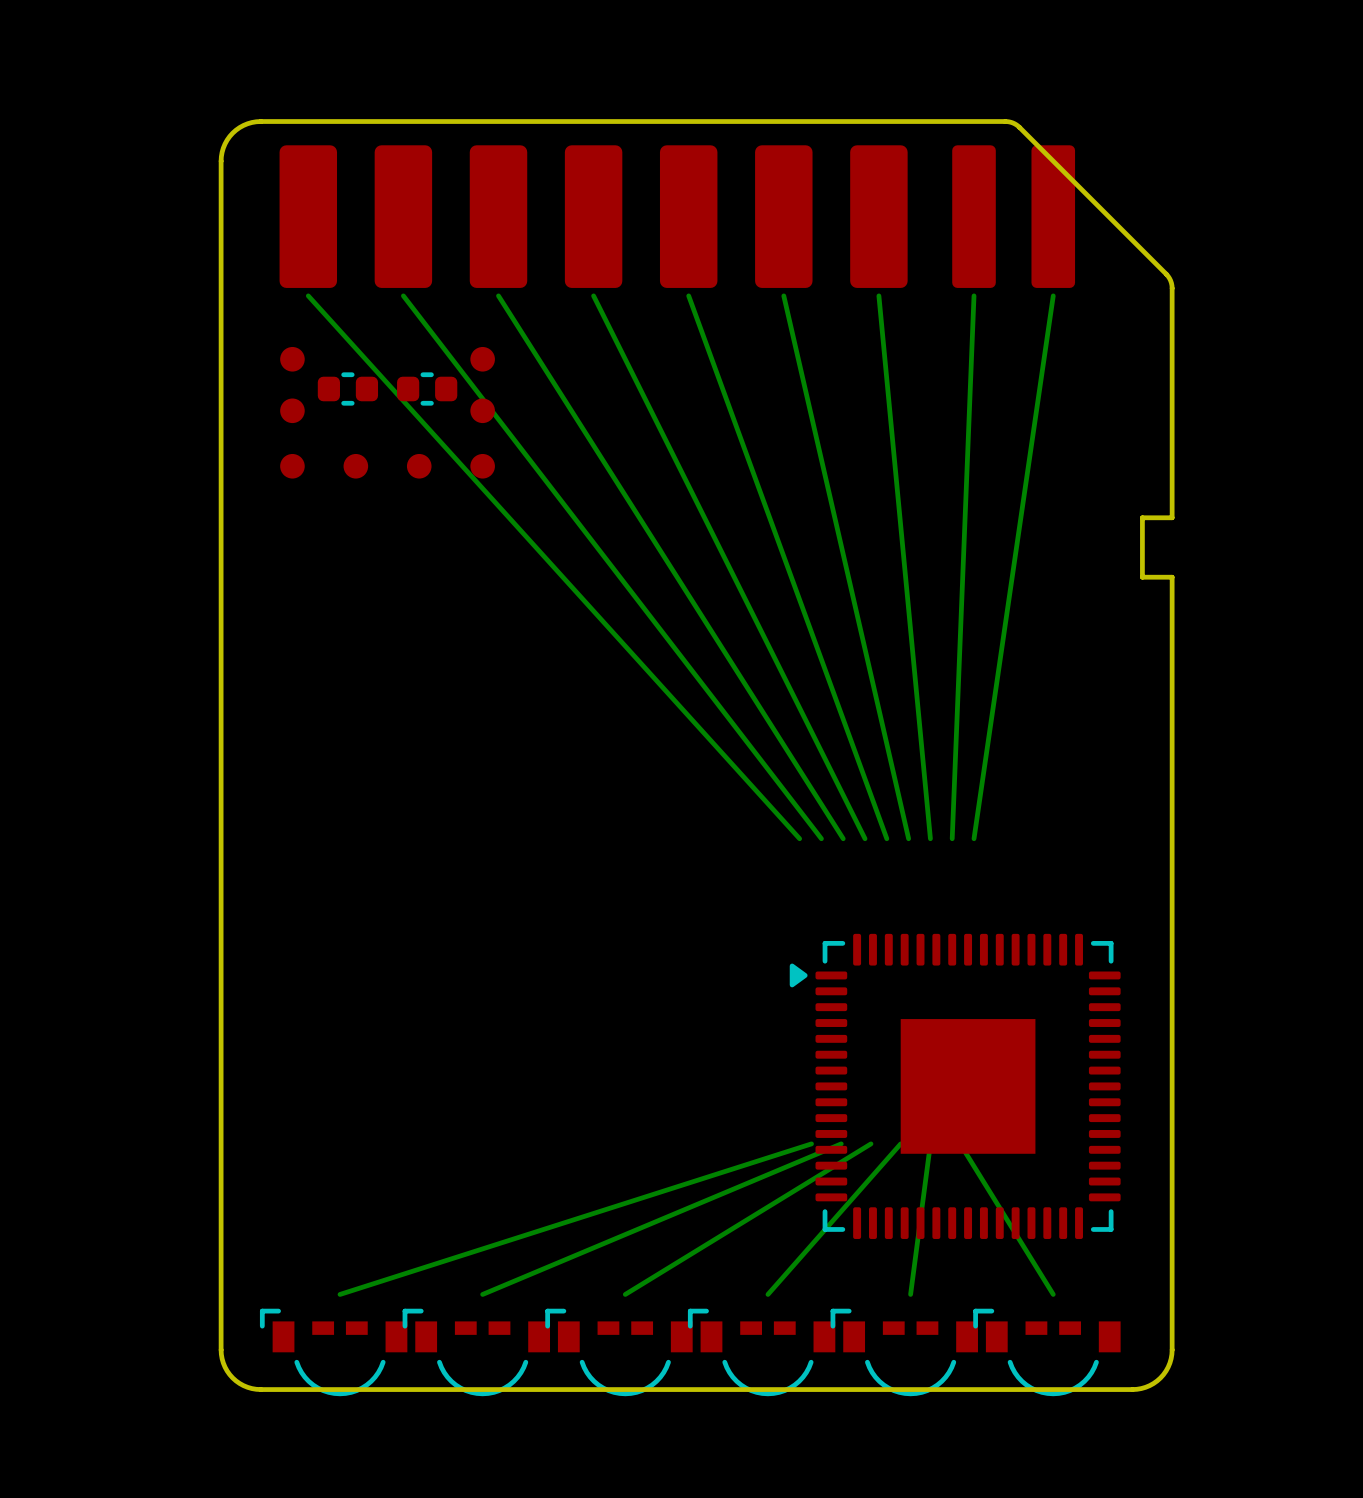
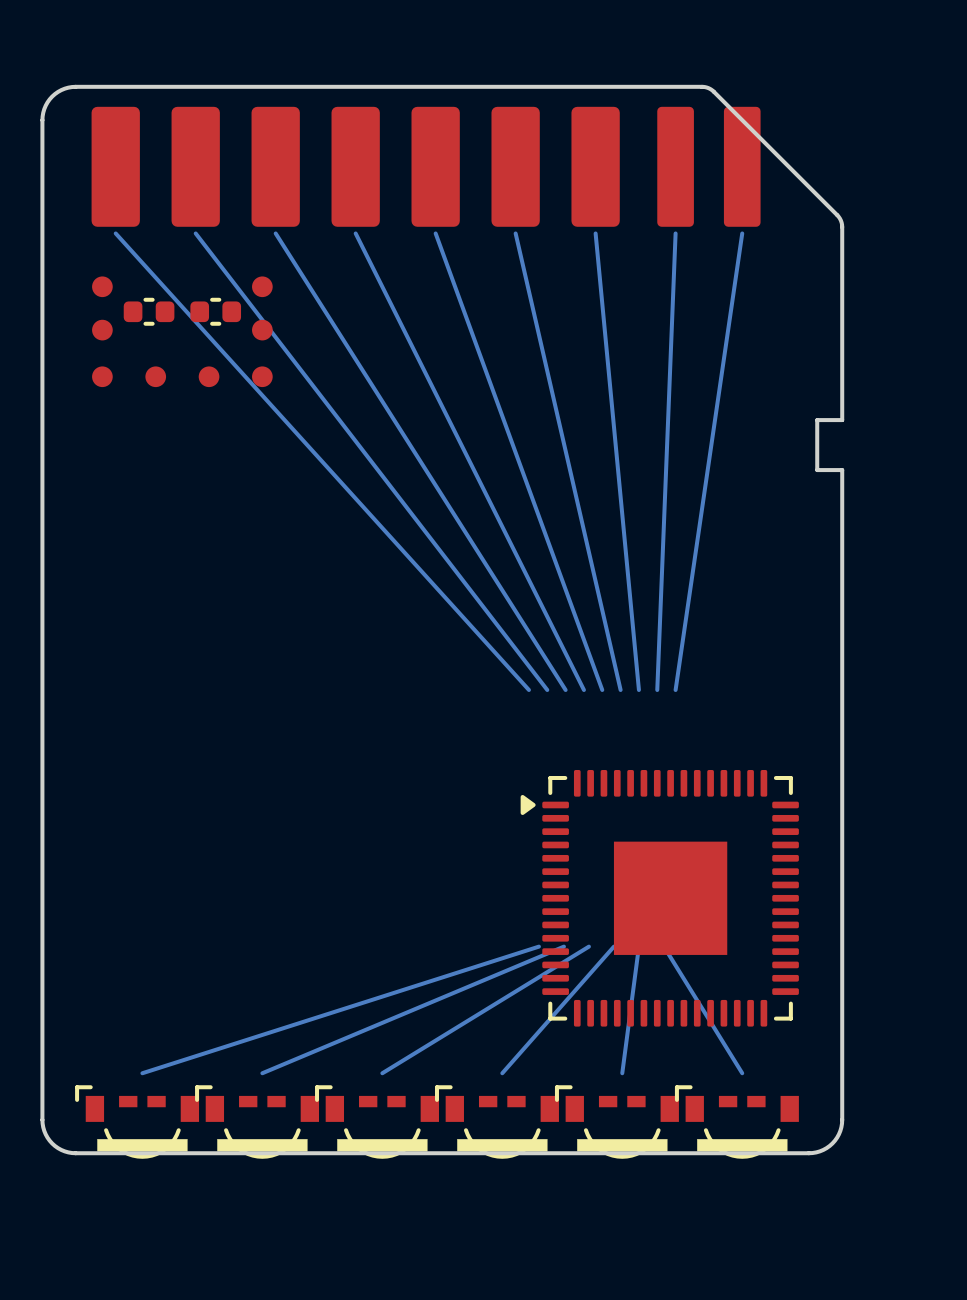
drawing: none -> [97, 1139, 788, 1152]

